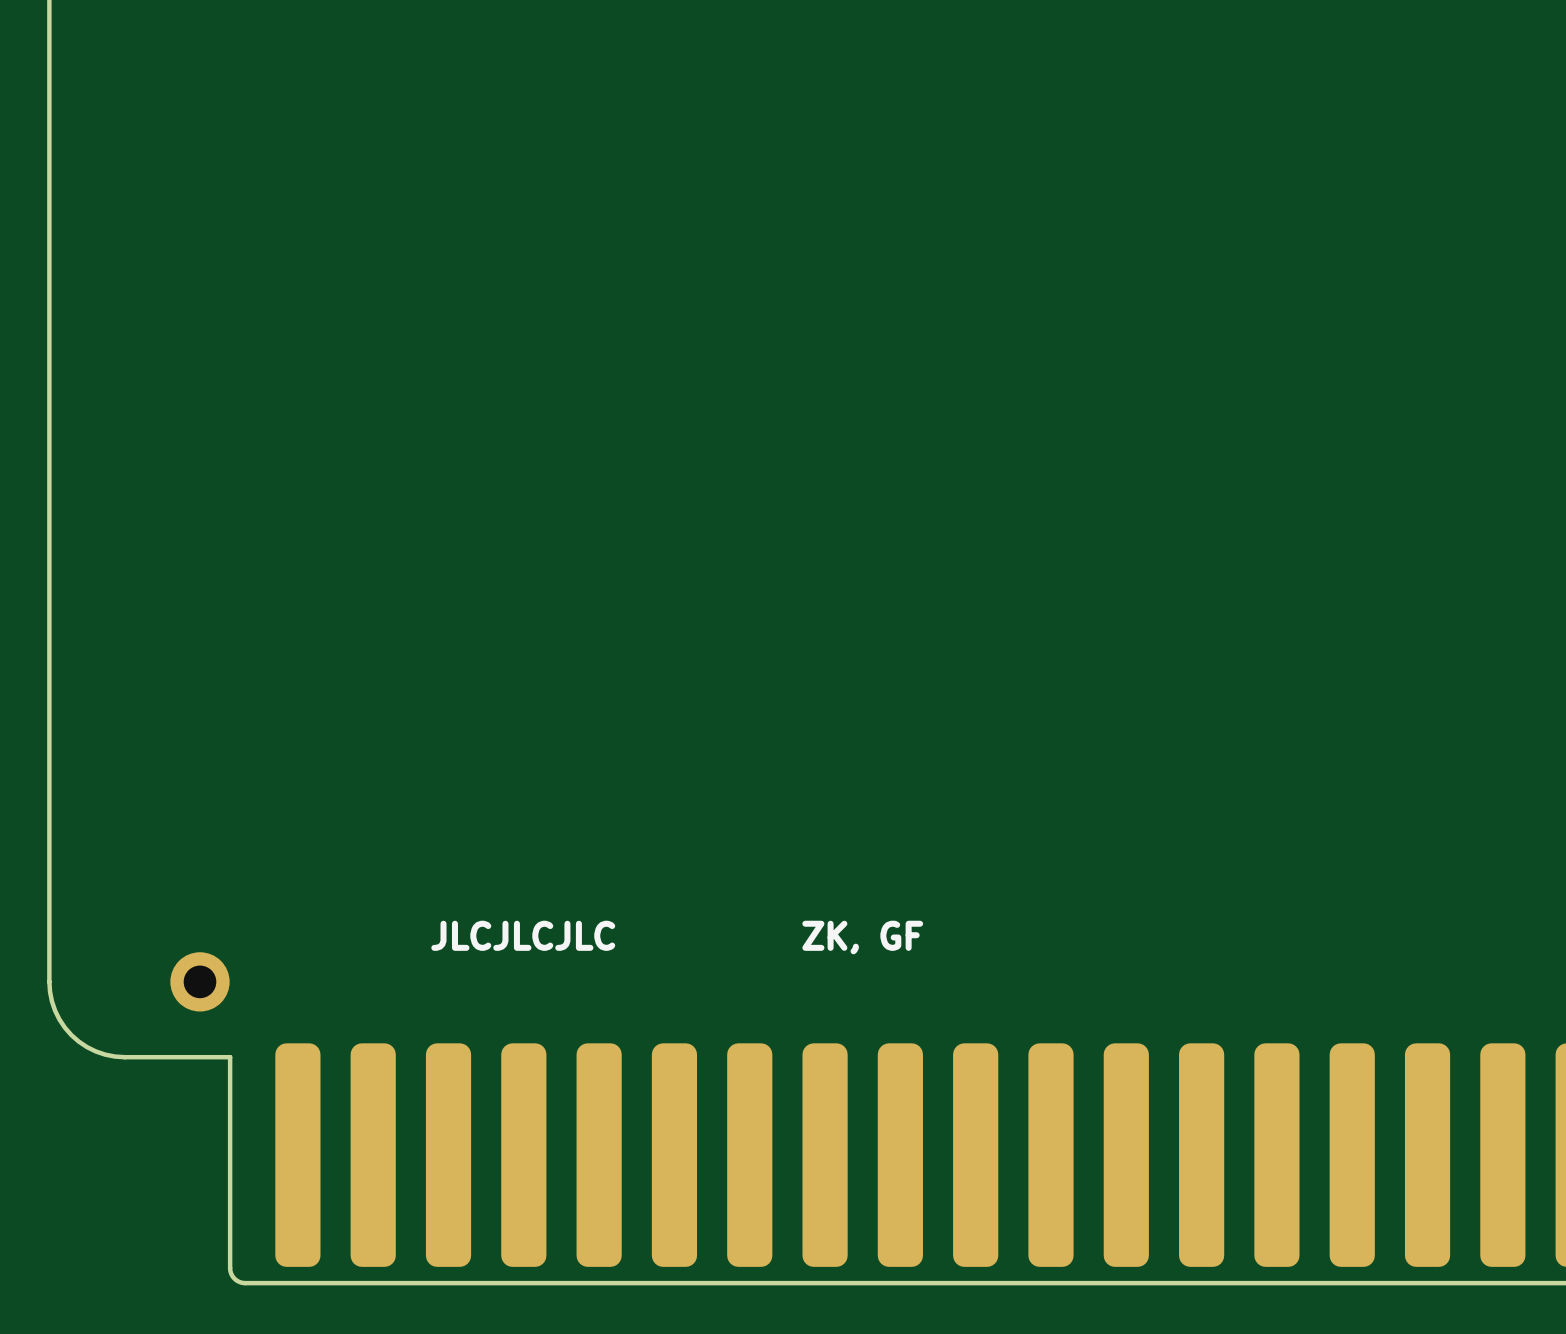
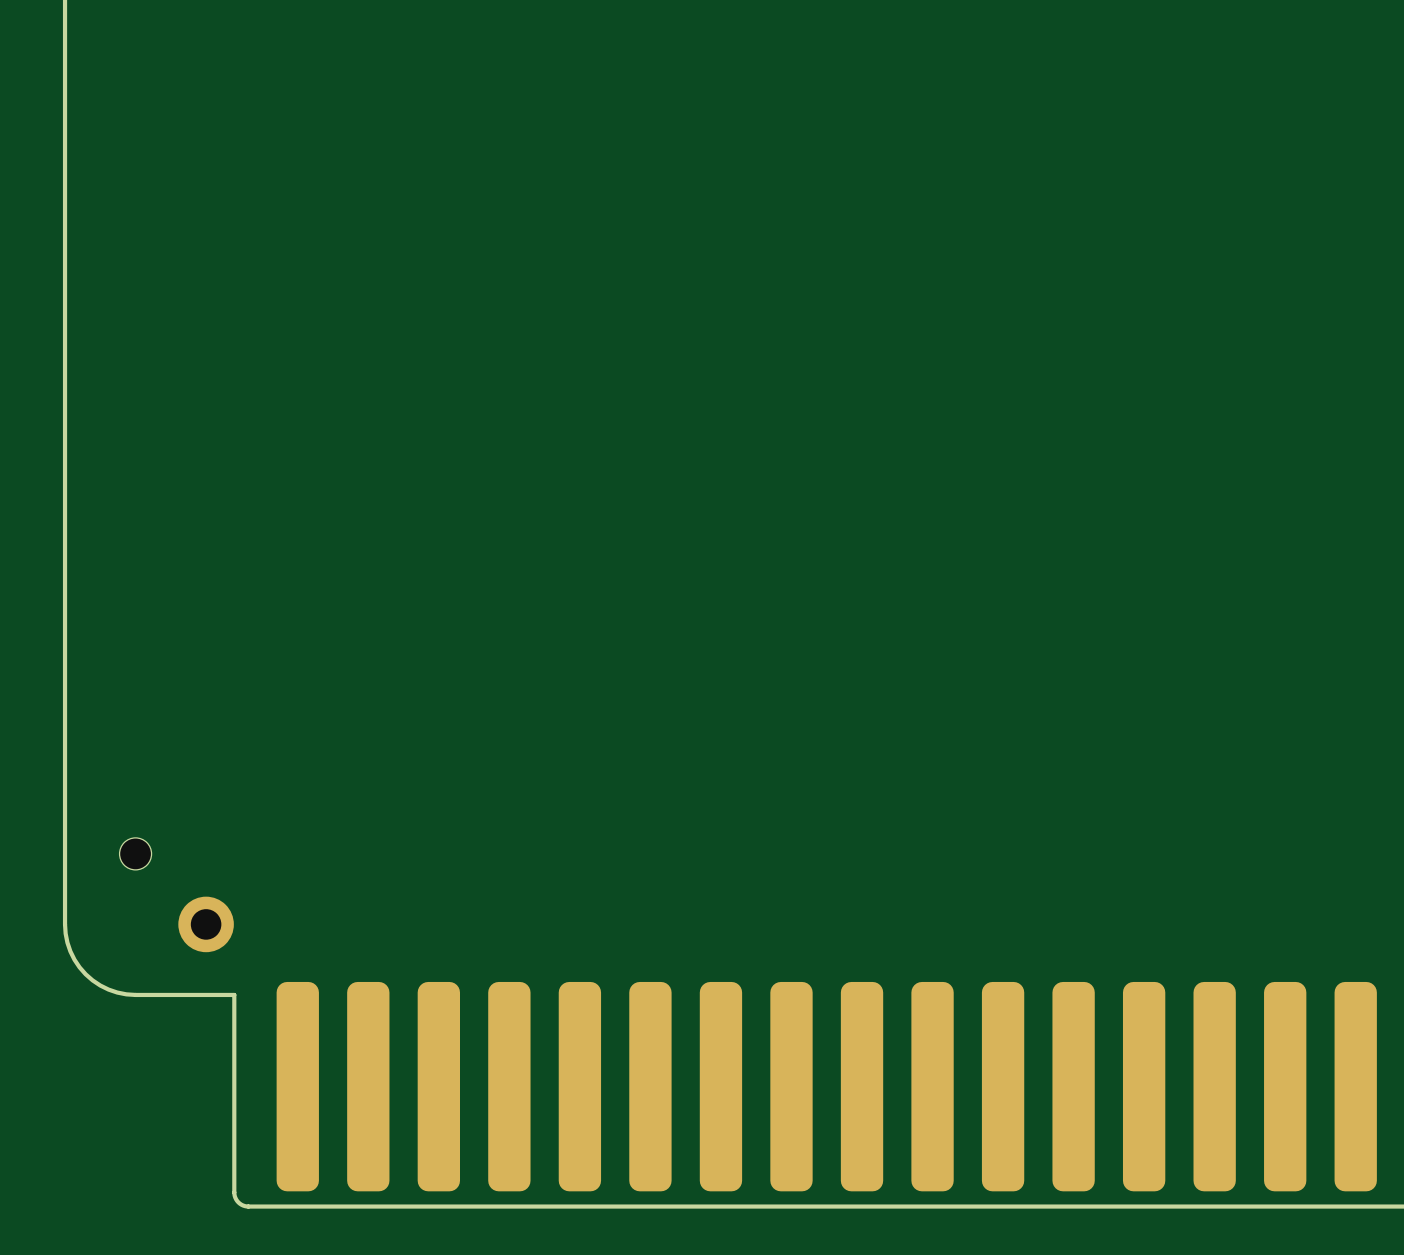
part: none -> (135, 853)
text: JLCJLCJLC (523, 935) -> none
text: ZK, GF (862, 937) -> none

